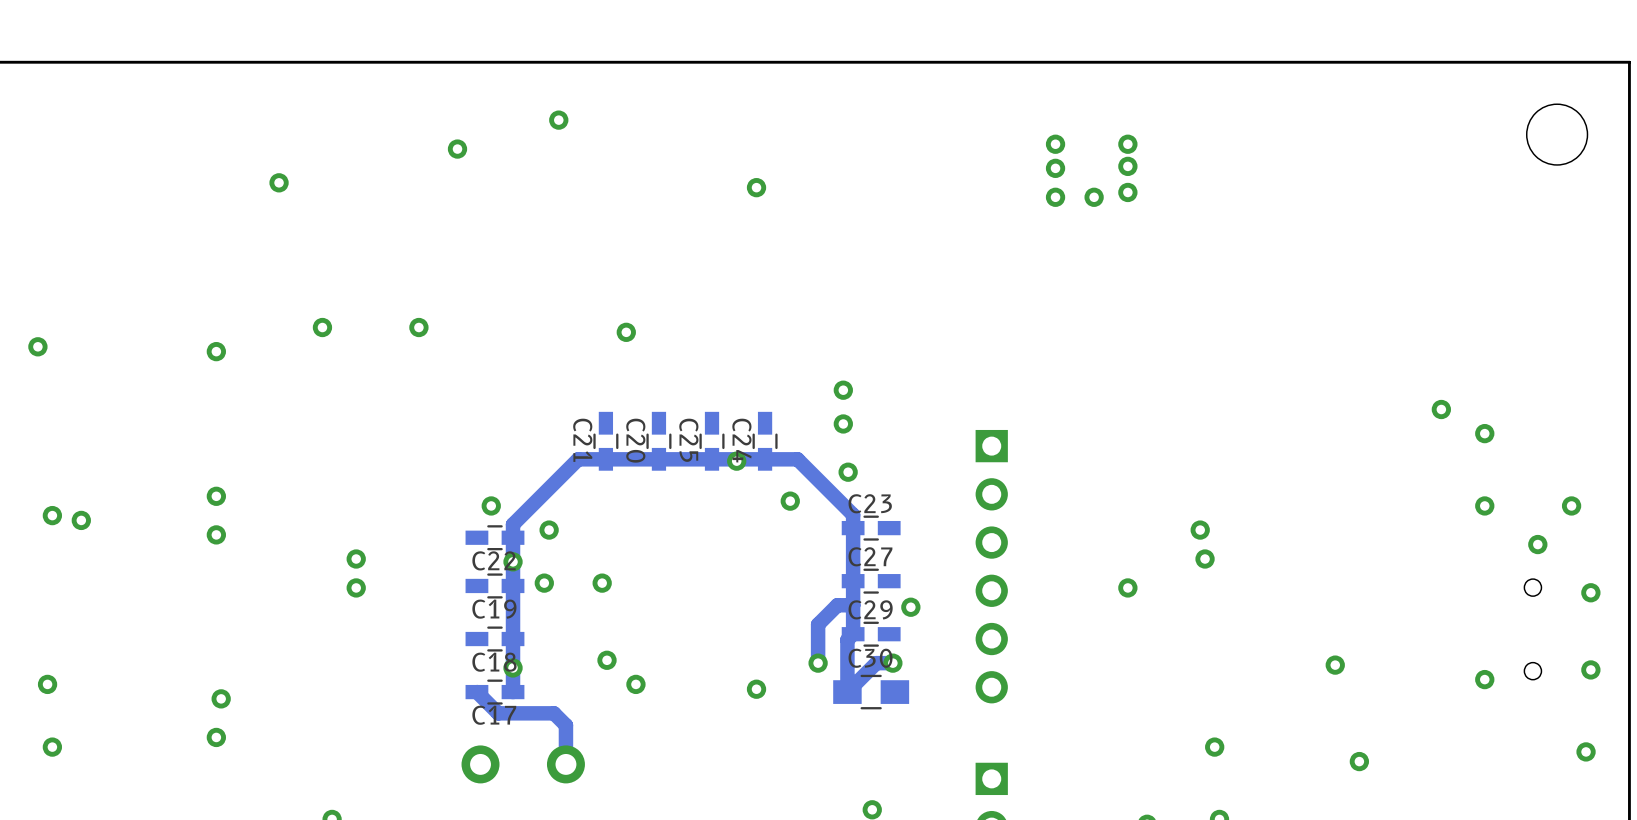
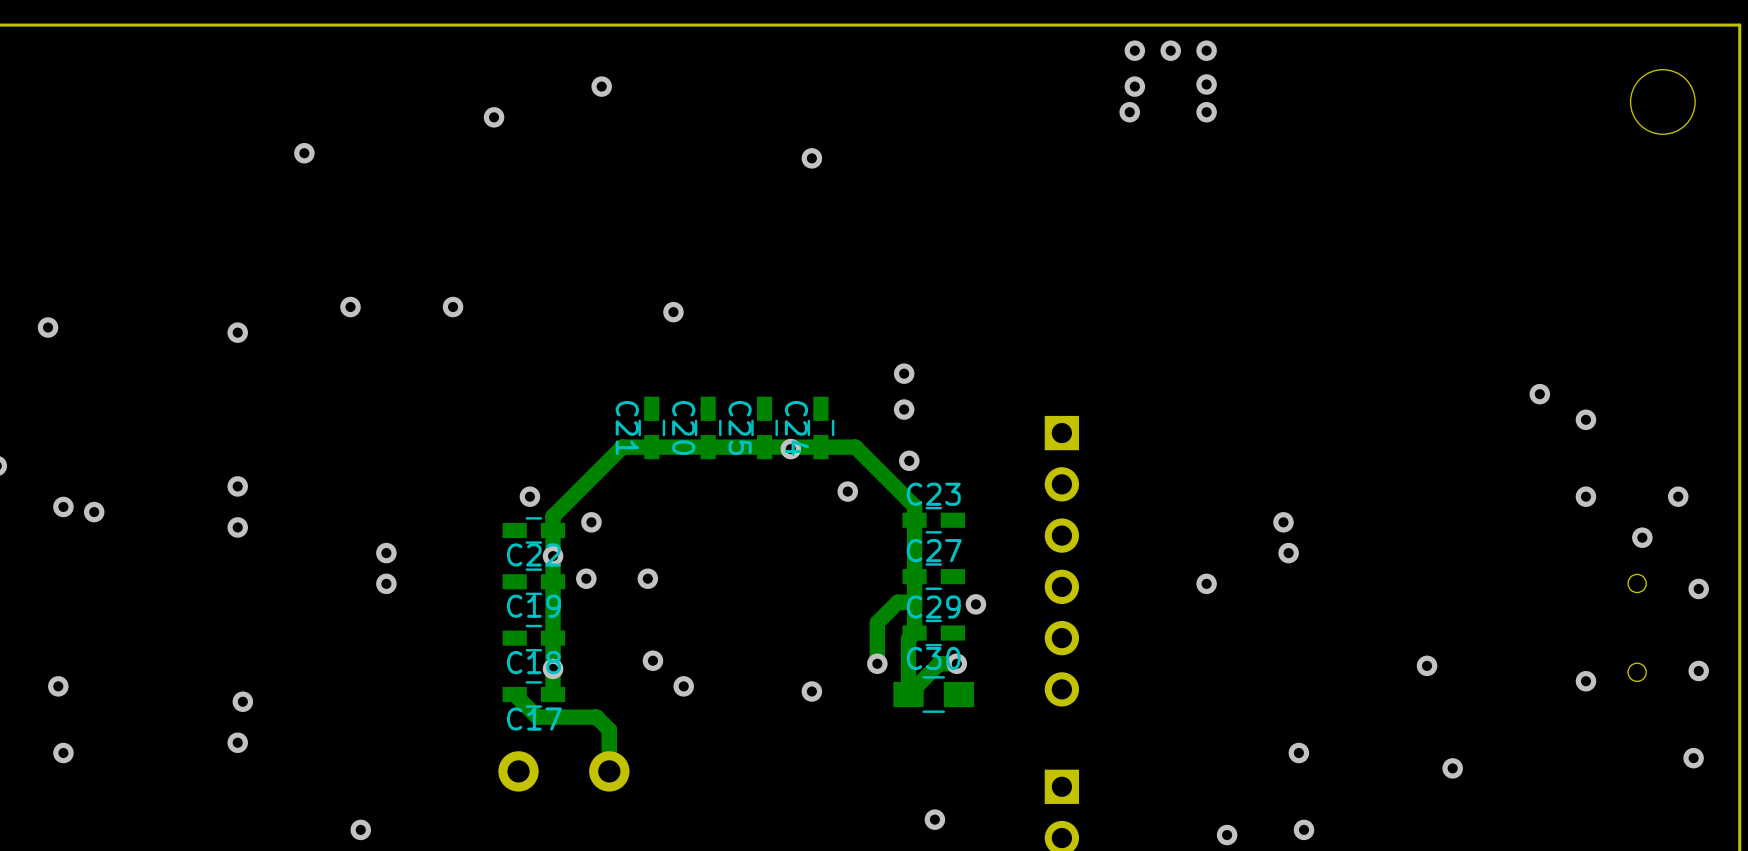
via: none -> (1134, 50)
via: none -> (1170, 50)
via: none -> (1206, 50)
via: none -> (1206, 84)
via: none -> (1134, 86)
via: (1127, 166) -> none
via: (1055, 168) -> none
via: (1127, 192) -> none
via: (1055, 197) -> none
via: (1094, 197) -> none

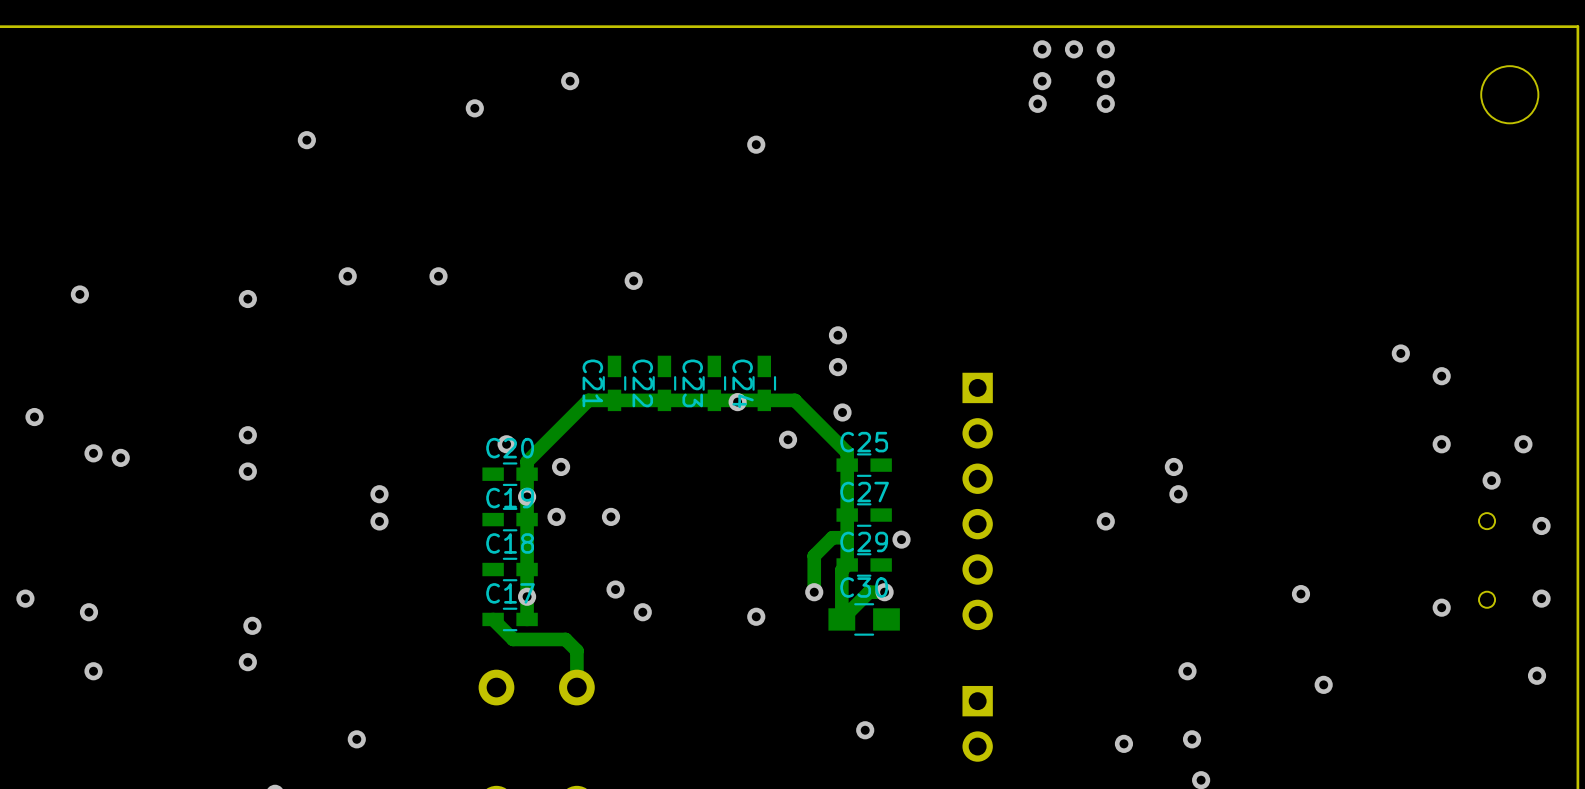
C20 name: C20 (683, 427) -> C22 (642, 383)
C25 name: C25 (740, 427) -> C23 (692, 383)
C23 name: C23 (933, 494) -> C25 (864, 442)
C22 name: C22 (533, 554) -> C20 (510, 448)
C19 name position: C19 (533, 606) -> C19 (510, 498)
C18 name position: C18 (533, 662) -> C18 (510, 543)
C17 name position: C17 (534, 718) -> C17 (510, 593)

